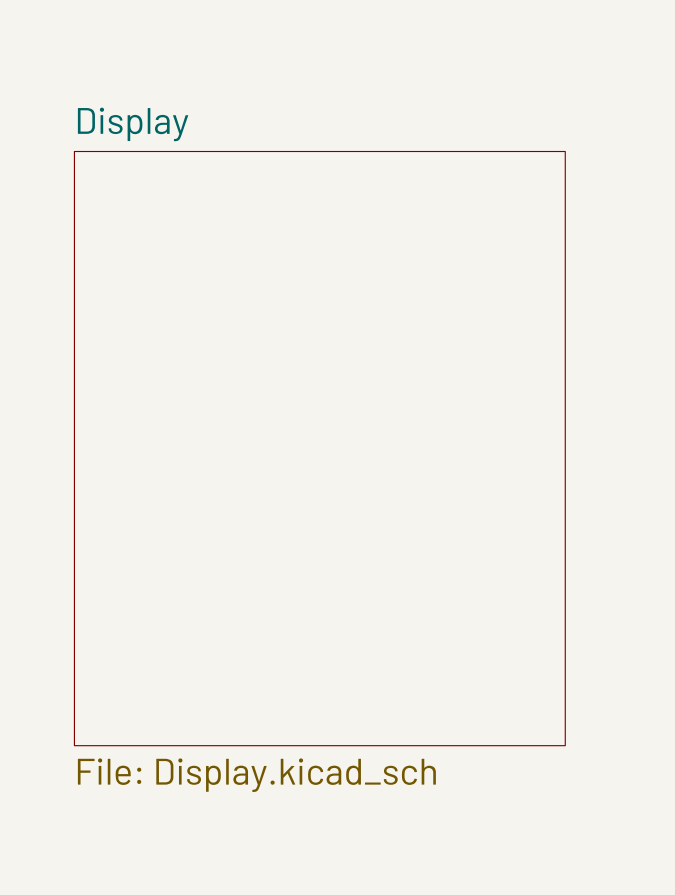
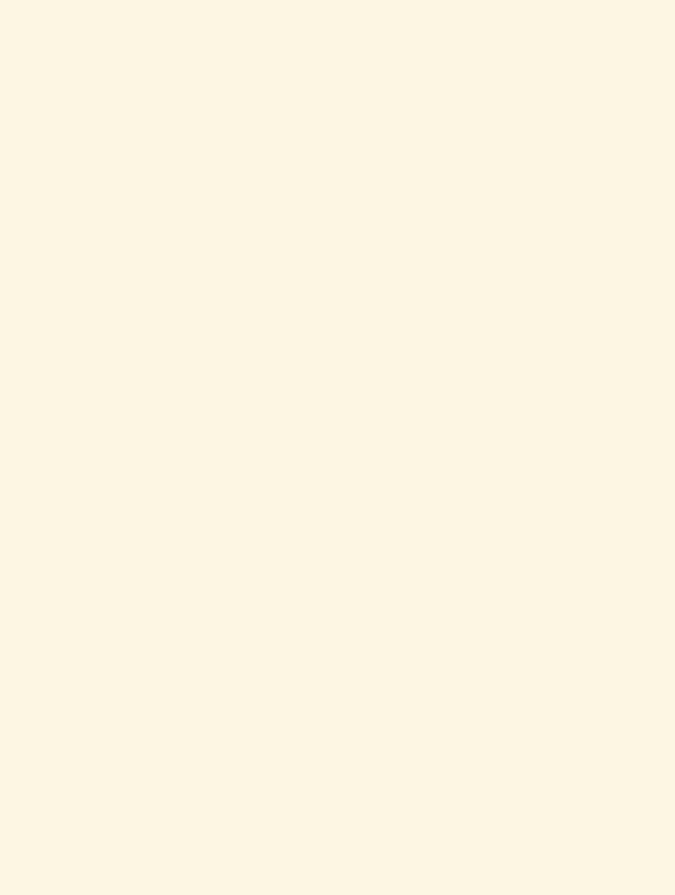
sheet Display: File: Display.kicad_sch (319, 448) -> none

